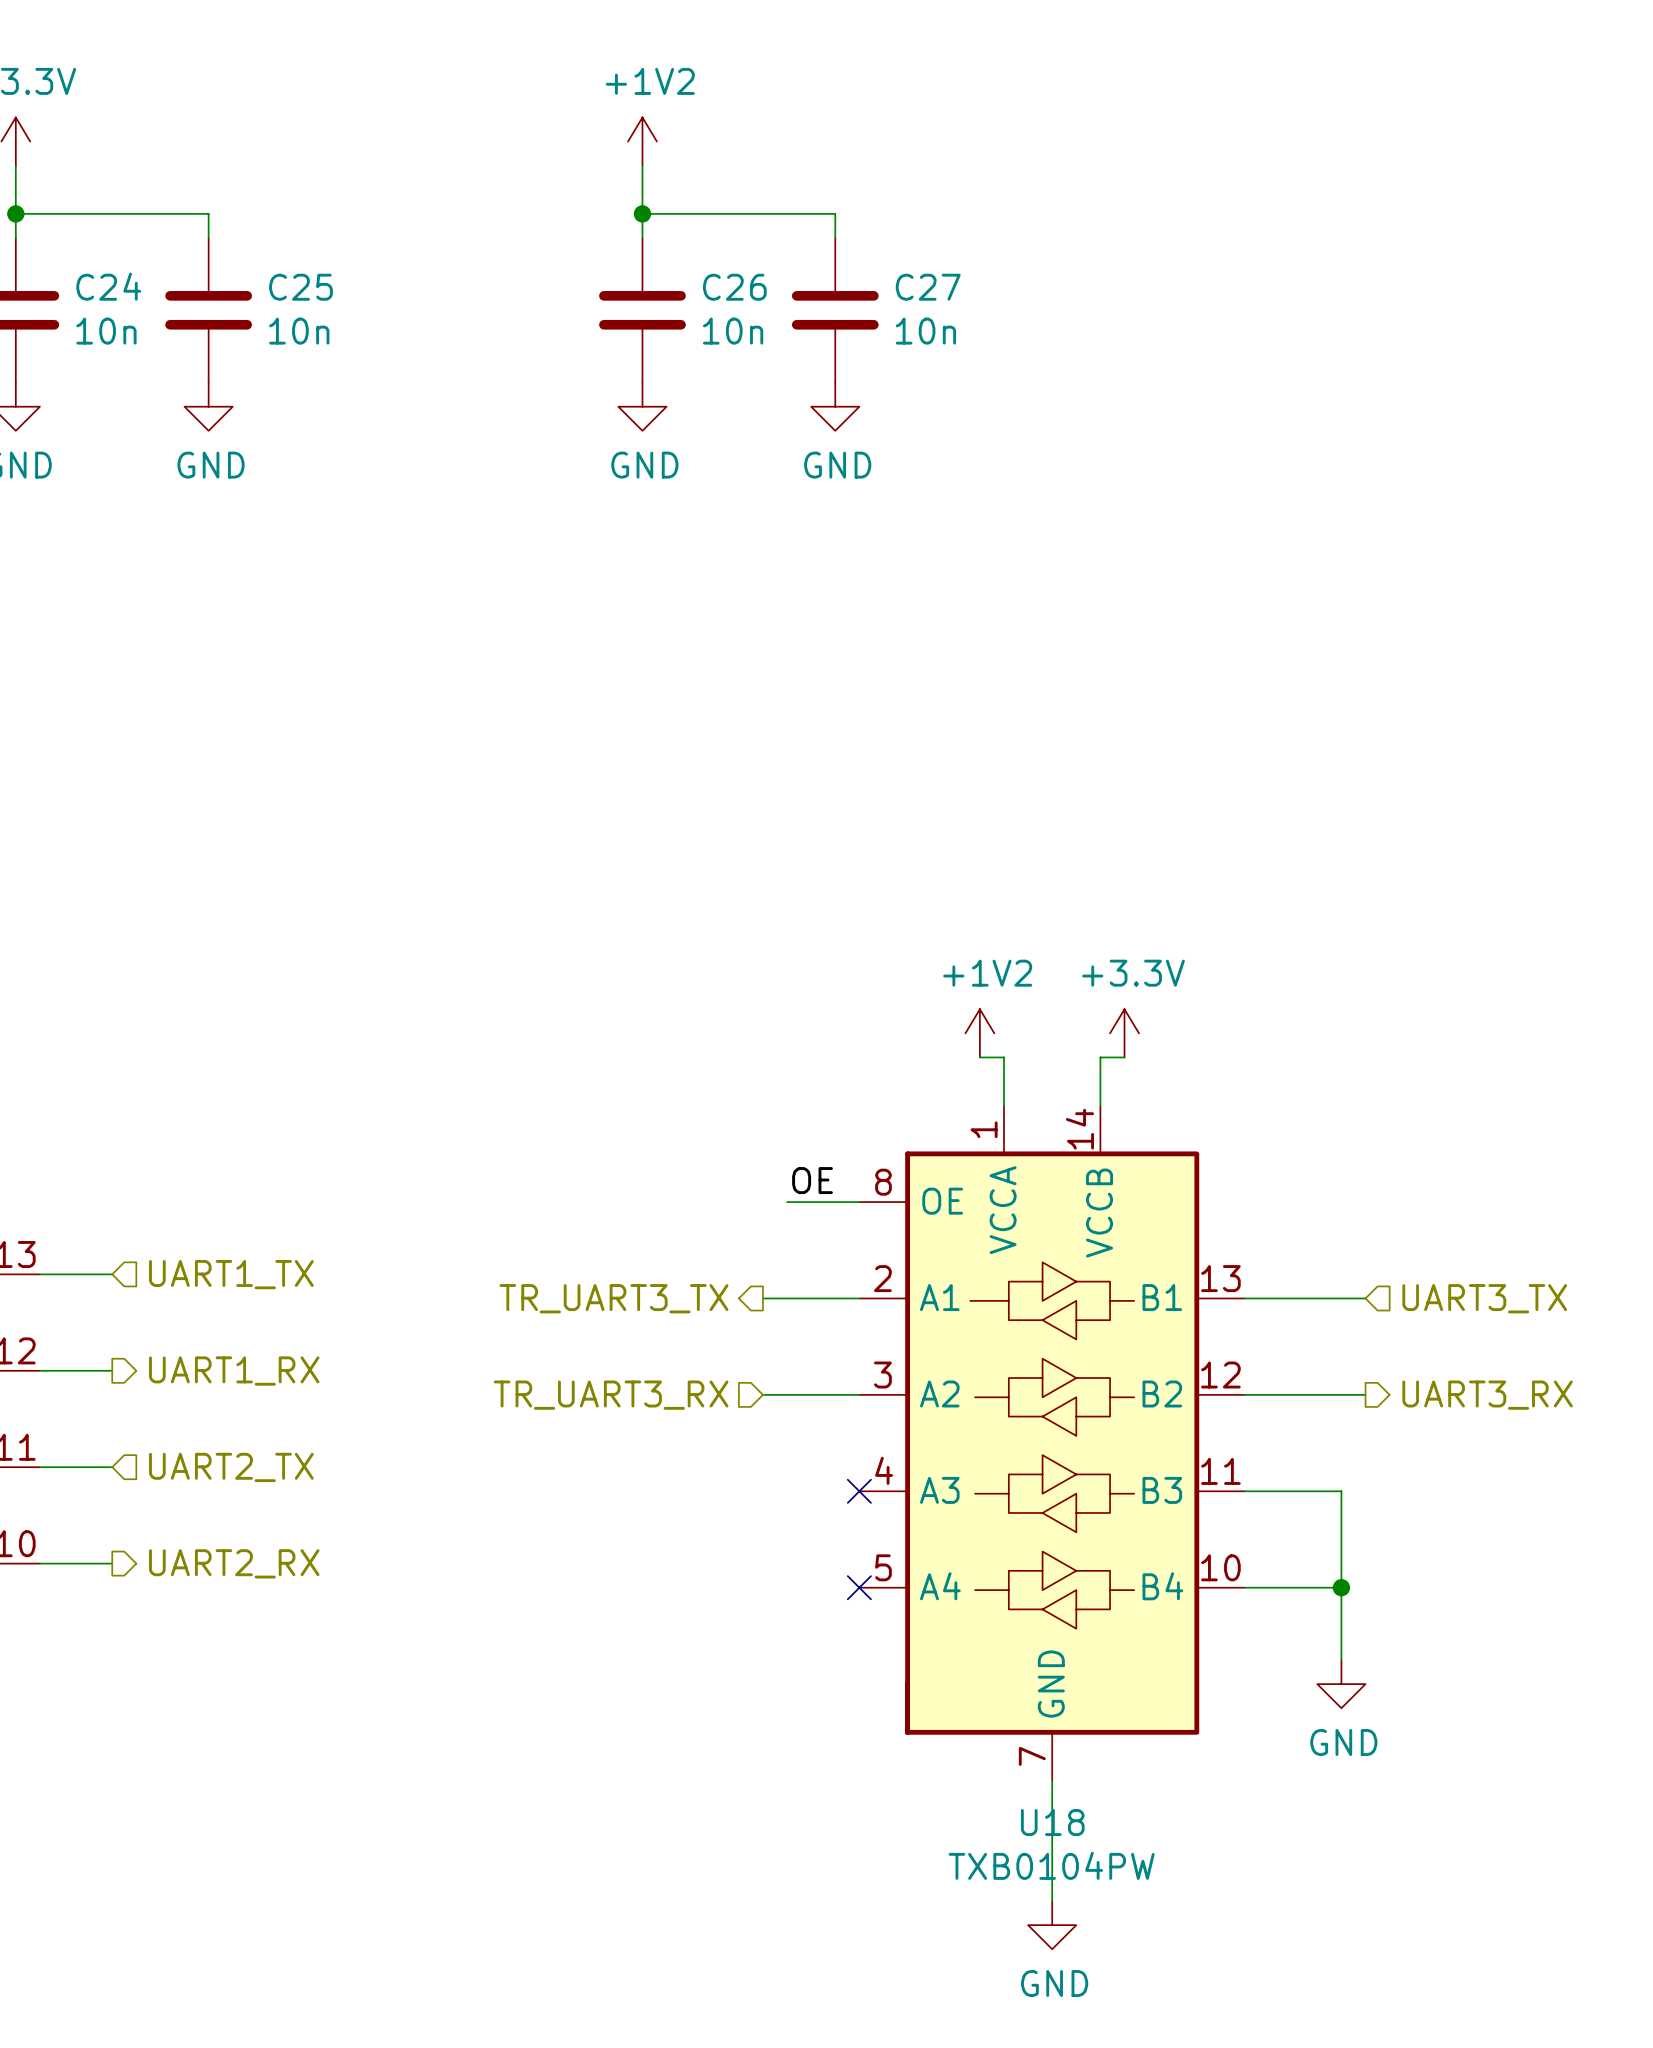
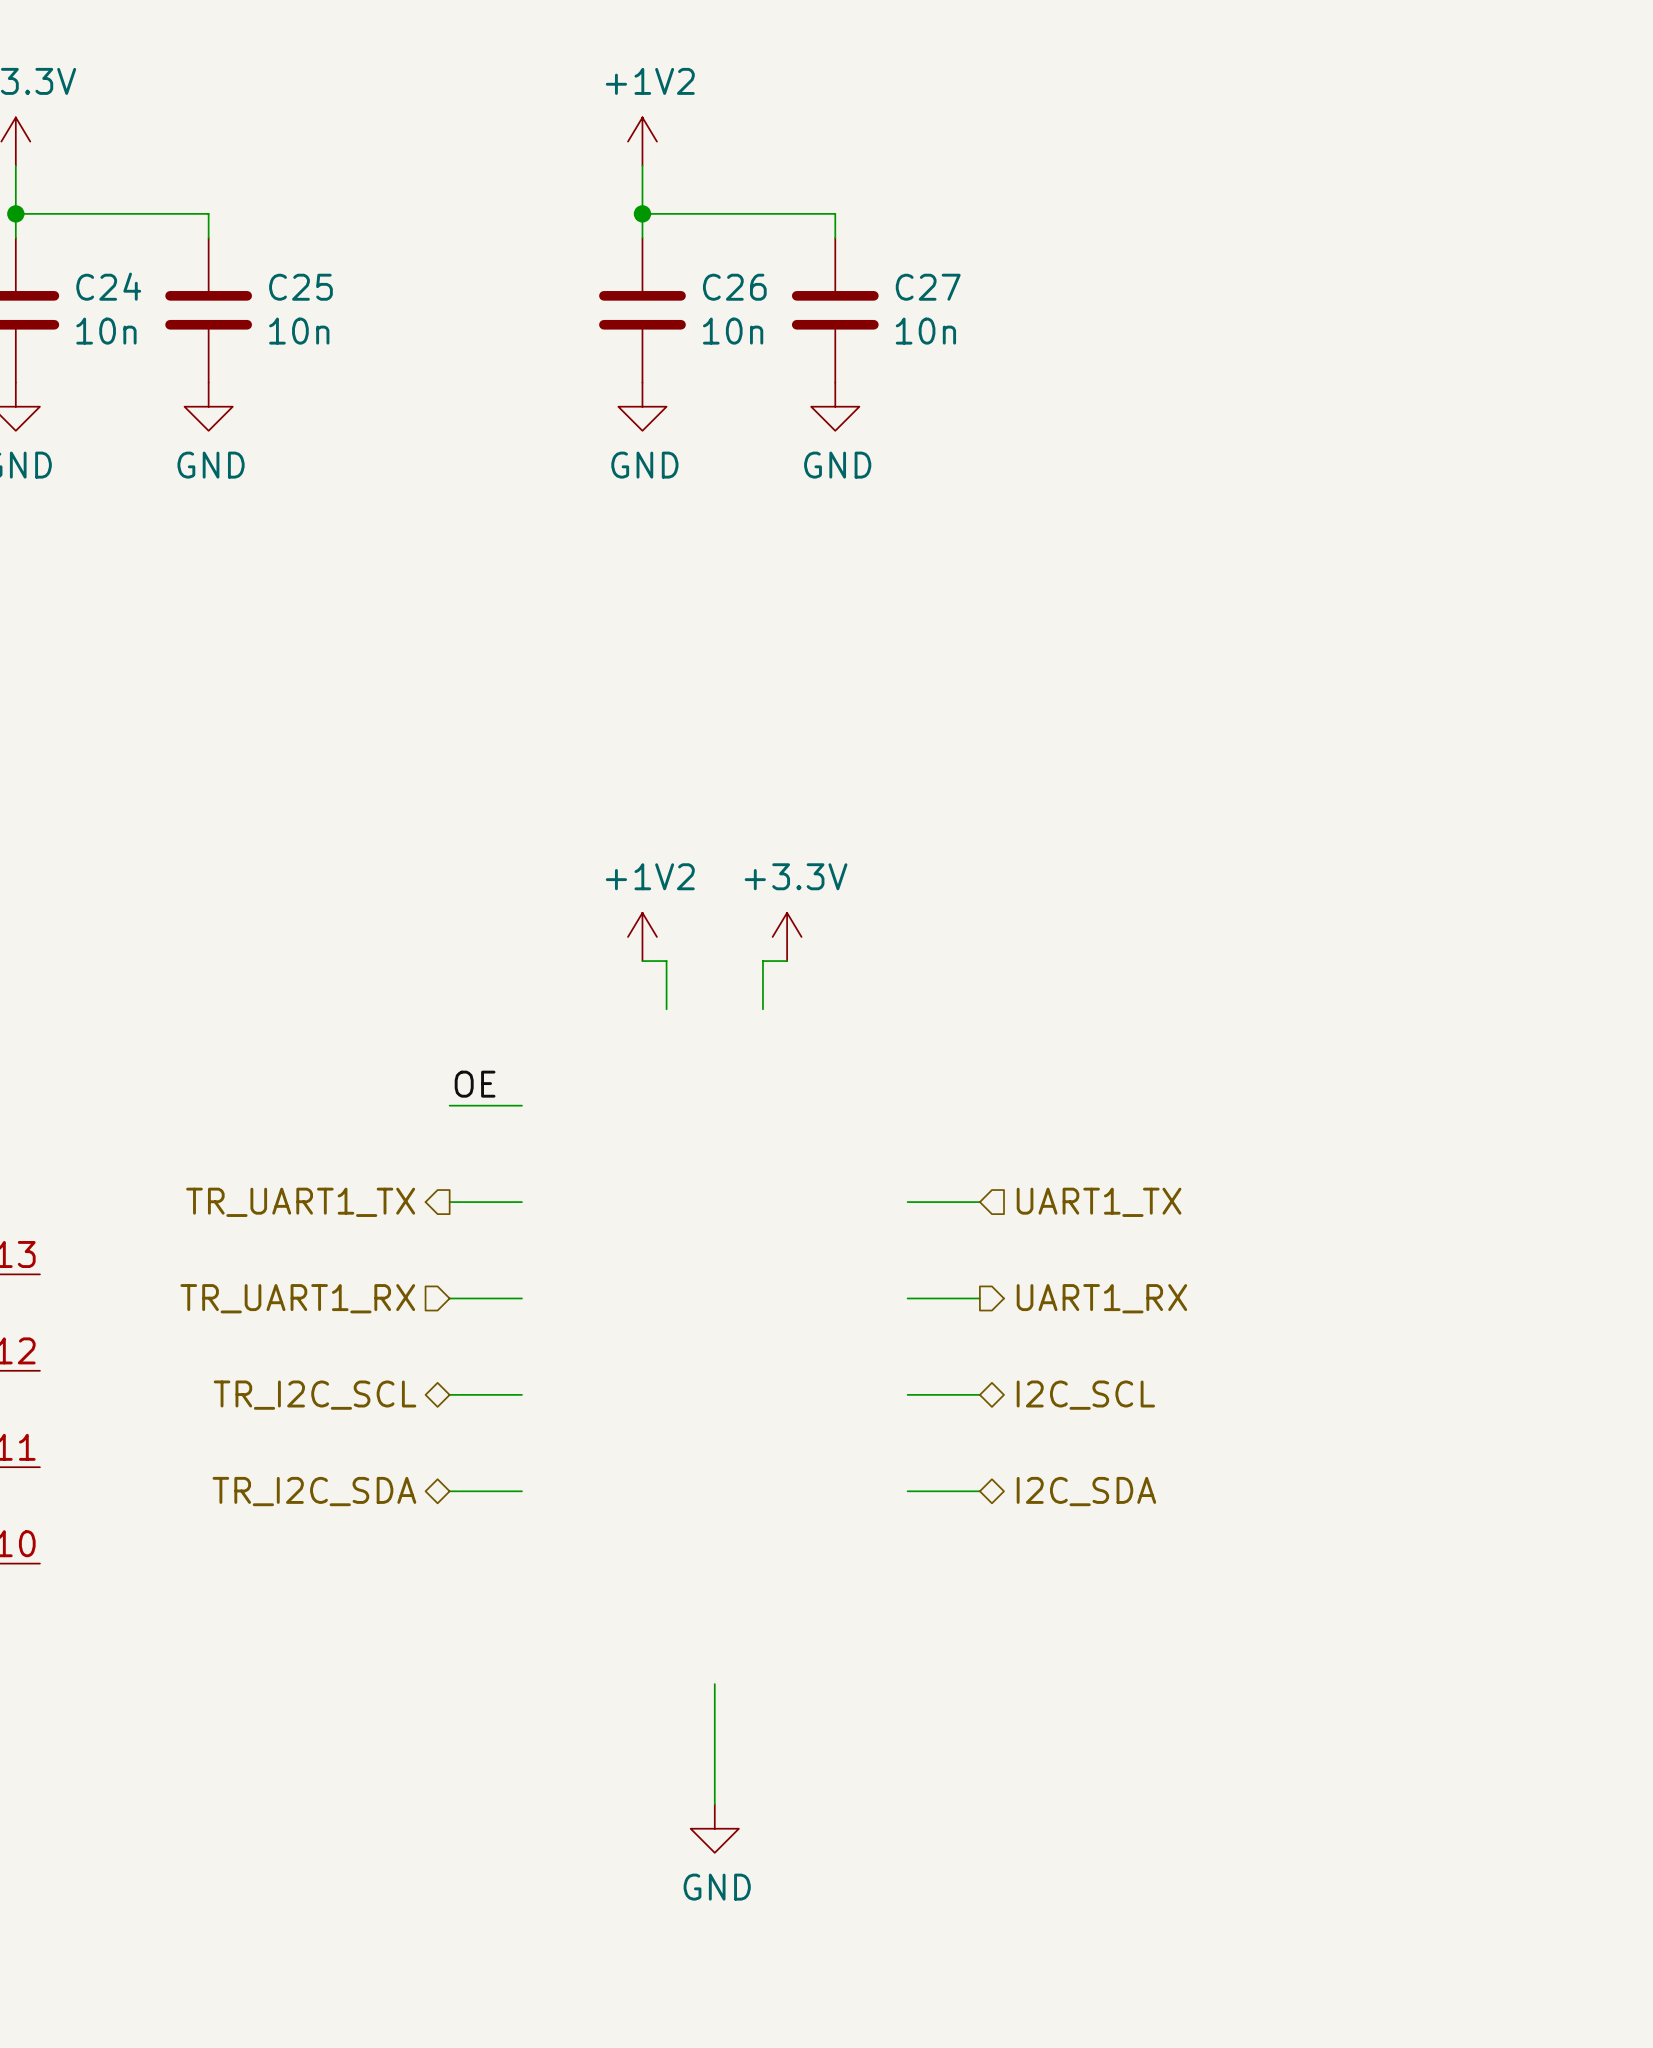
power symbol position: +1V2 (979, 1033) -> +1V2 (642, 936)
power symbol position: +3.3V (1124, 1033) -> +3.3V (787, 936)
wire: (979, 1057) (1004, 1057) (1004, 1105) -> (642, 961) (666, 961) (666, 1009)
wire: (1124, 1057) (1100, 1057) (1100, 1105) -> (787, 961) (762, 961) (762, 1009)
label position: OE (812, 1180) -> OE (475, 1084)
hierarchical label: none -> TR_UART1_TX (300, 1202)
wire: (787, 1202) (859, 1202) -> (449, 1105) (521, 1105)
hierarchical label: none -> UART1_TX (1099, 1202)
wire: (39, 1274) (112, 1274) -> (449, 1202) (521, 1202)
hierarchical label: UART1_TX (231, 1274) -> TR_UART1_RX (297, 1298)
hierarchical label: TR_UART3_TX (613, 1298) -> none
wire: (762, 1298) (859, 1298) -> none
hierarchical label: none -> UART1_RX (1101, 1298)
wire: (1245, 1298) (1365, 1298) -> none
hierarchical label: UART3_TX (1484, 1298) -> none
wire: (39, 1370) (112, 1370) -> (449, 1298) (521, 1298)
hierarchical label: UART1_RX (234, 1371) -> none
wire: (762, 1394) (859, 1394) -> none
wire: (1245, 1394) (1365, 1394) -> none
hierarchical label: none -> TR_I2C_SCL (315, 1395)
hierarchical label: TR_UART3_RX (611, 1395) -> none
hierarchical label: none -> I2C_SCL (1085, 1395)
hierarchical label: UART3_RX (1487, 1395) -> none
U18: TXB0104PW (1052, 1443) -> none
wire: (39, 1467) (112, 1467) -> (449, 1394) (521, 1394)
hierarchical label: UART2_TX (231, 1467) -> none
hierarchical label: none -> TR_I2C_SDA (314, 1491)
no-connect mark: (859, 1491) -> none
hierarchical label: none -> I2C_SDA (1086, 1491)
wire: (1245, 1491) (1341, 1491) (1341, 1660) -> none
wire: (39, 1563) (112, 1563) -> (449, 1491) (521, 1491)
hierarchical label: UART2_RX (234, 1563) -> none
no-connect mark: (859, 1587) -> none
wire: (1245, 1587) (1341, 1587) -> none
junction: (1341, 1587) -> none
power symbol: GND (1341, 1684) -> none
wire: (1052, 1780) (1052, 1901) -> (714, 1684) (714, 1804)
power symbol: none -> GND (714, 1828)
power symbol: GND (1052, 1925) -> none

